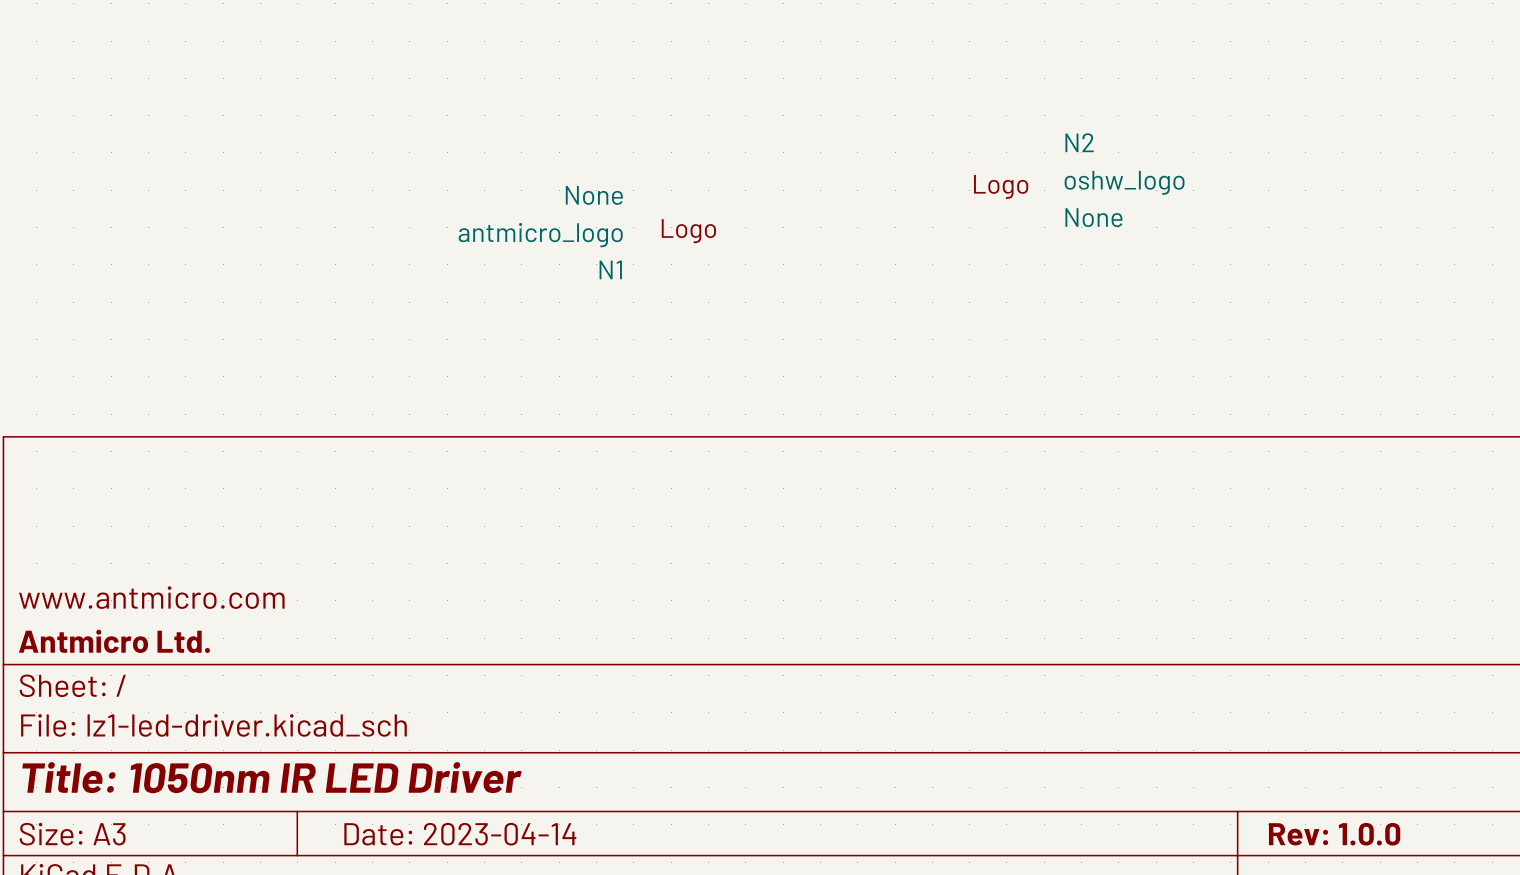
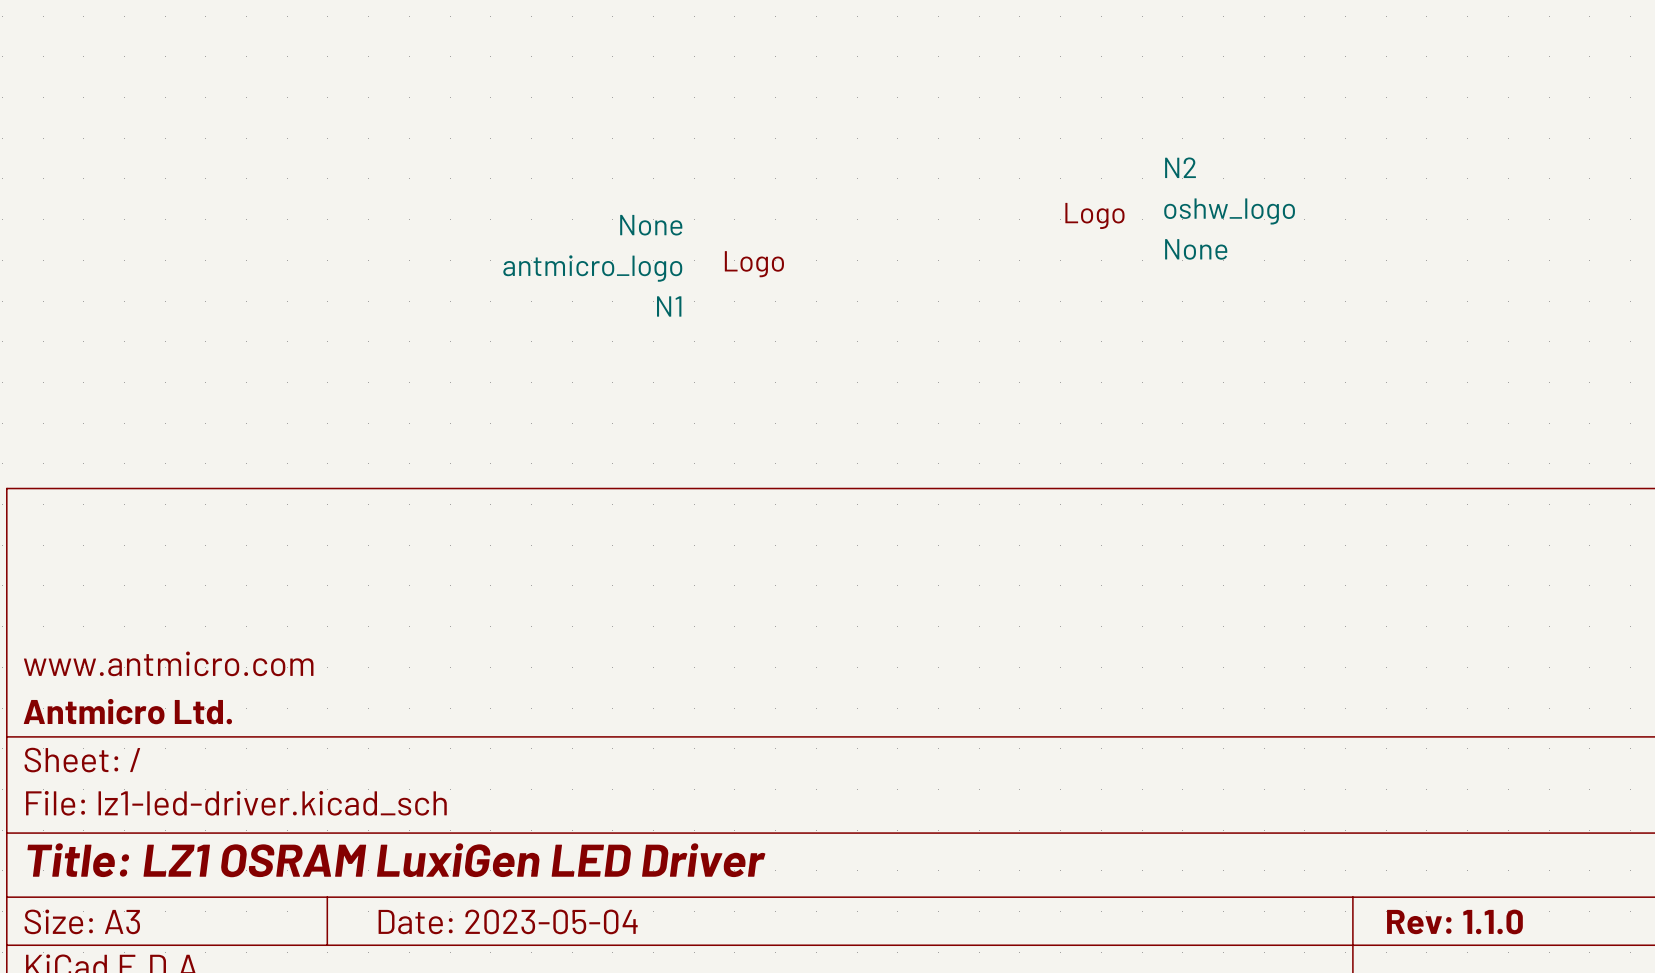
title block: Title: 1050nm IR LED Driver (272, 777) -> Title: LZ1 OSRAM LuxiGen LED Driver (396, 860)
title block: Date: 2023-04-14 (460, 834) -> Date: 2023-05-04 (508, 921)
title block: Rev: 1.0.0 (1334, 834) -> Rev: 1.1.0 (1454, 921)

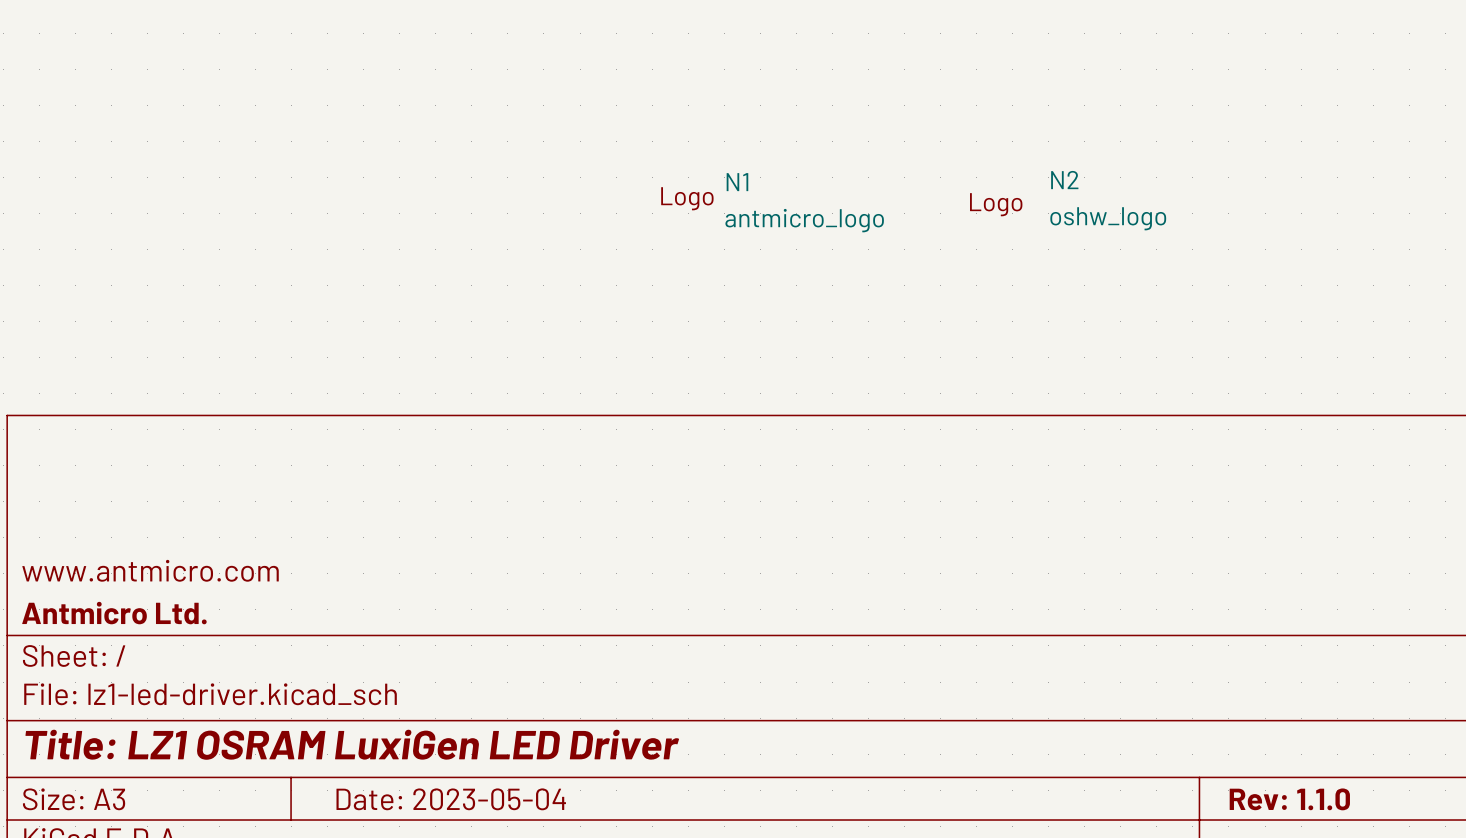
N2 name position: N2 (1180, 167) -> N2 (1064, 180)
N2 position: (1180, 208) -> (1068, 200)
N2 value position: oshw_logo (1229, 211) -> oshw_logo (1108, 218)
N1 text: None (651, 225) -> none
N2 text: None (1196, 249) -> none
N1 position: (643, 265) -> (772, 202)
N1 value position: antmicro_logo (592, 268) -> antmicro_logo (804, 220)
N1 name position: N1 (669, 306) -> N1 (737, 182)

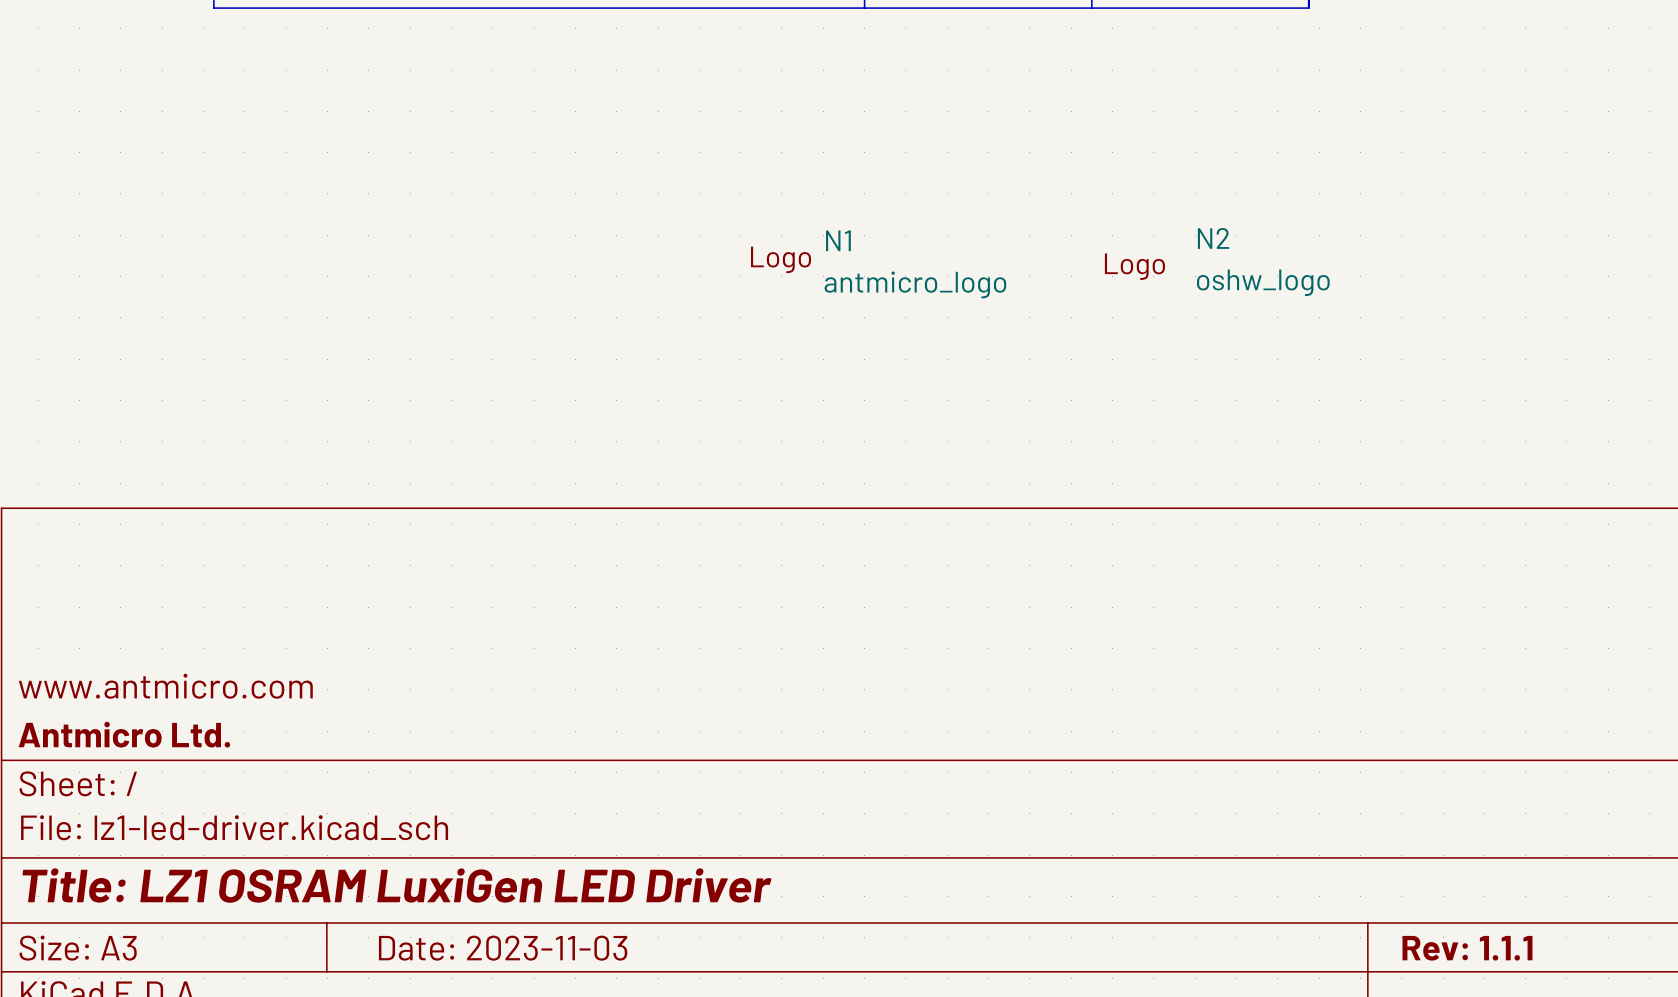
title block: Date: 2023-05-04 (451, 799) -> Date: 2023-11-03 (503, 948)
title block: Rev: 1.1.0 (1289, 799) -> Rev: 1.1.1 (1467, 948)

